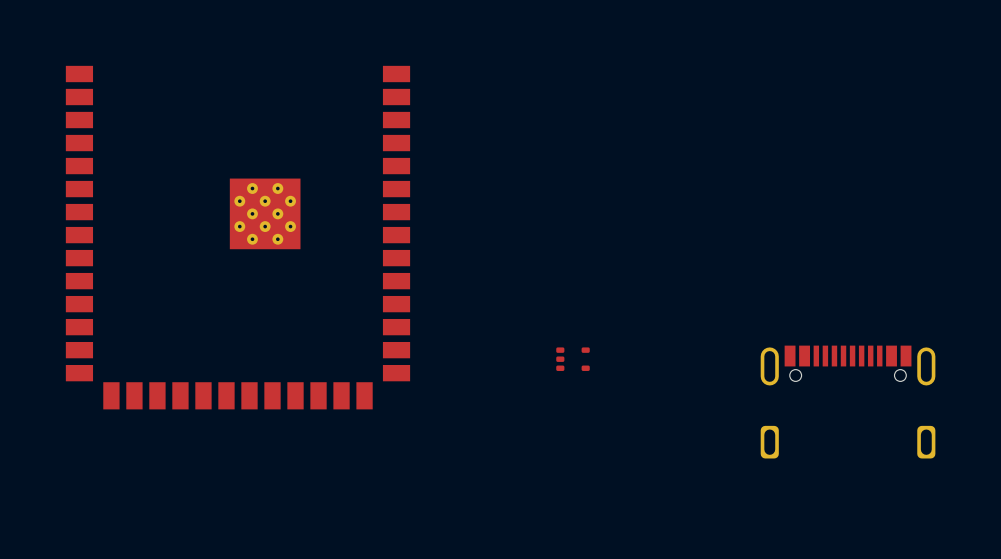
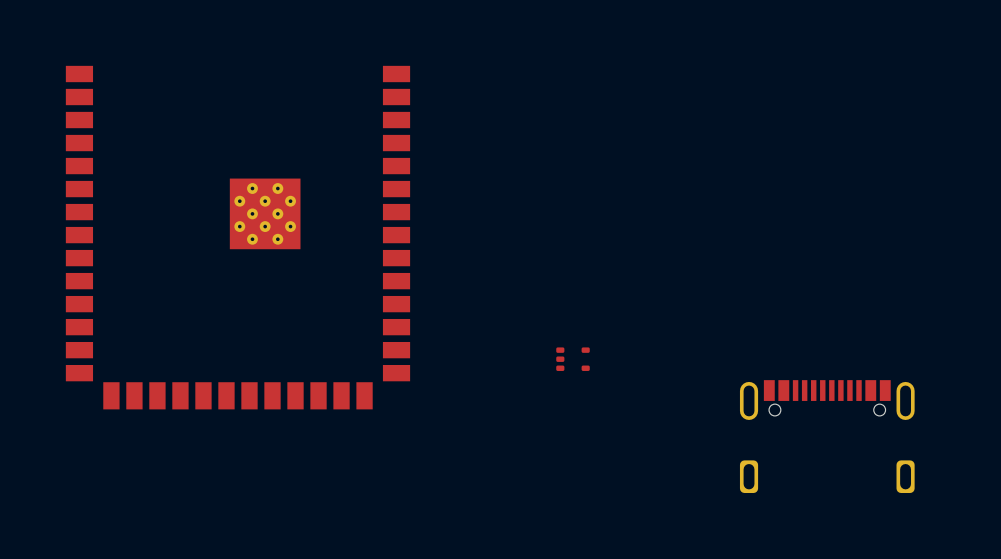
part position: (848, 402) -> (827, 436)

